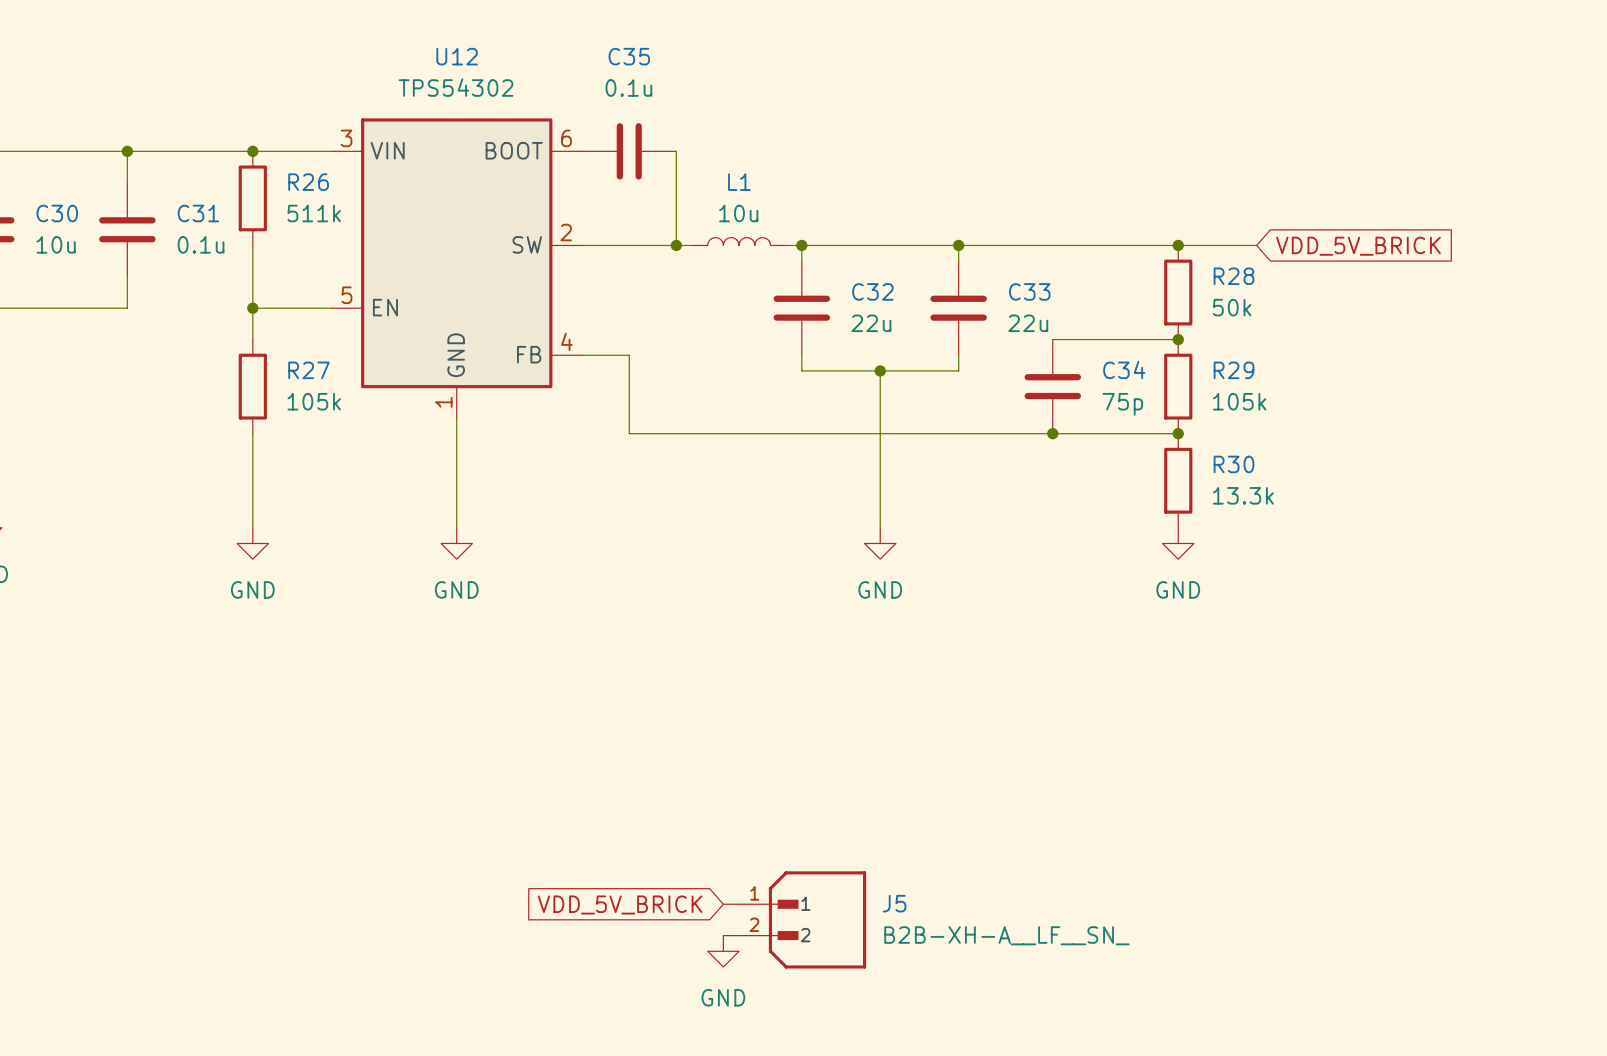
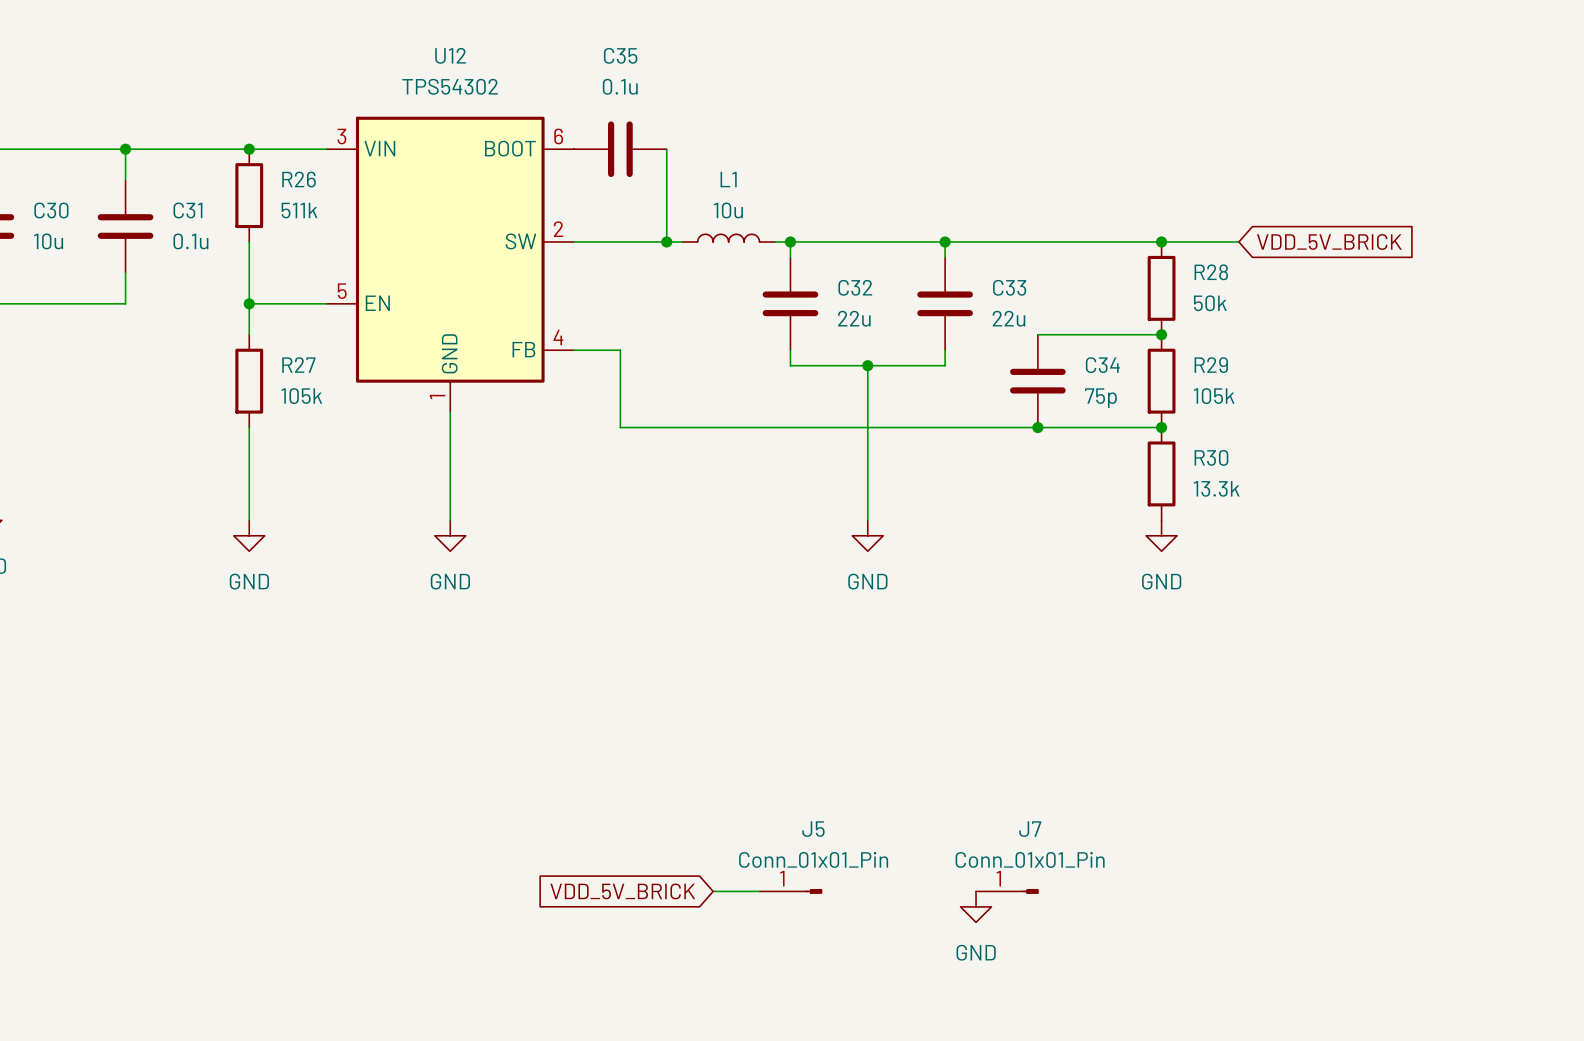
J5 symbol: [723, 871, 867, 969] -> [759, 888, 823, 894]
J5 name position: J5 (894, 903) -> J5 (813, 829)
J7: none -> Conn_01x01_Pin (1007, 891)
J5 value: B2B-XH-A__LF__SN_ (1006, 935) -> Conn_01x01_Pin (813, 859)
power symbol position: GND (723, 951) -> GND (976, 906)

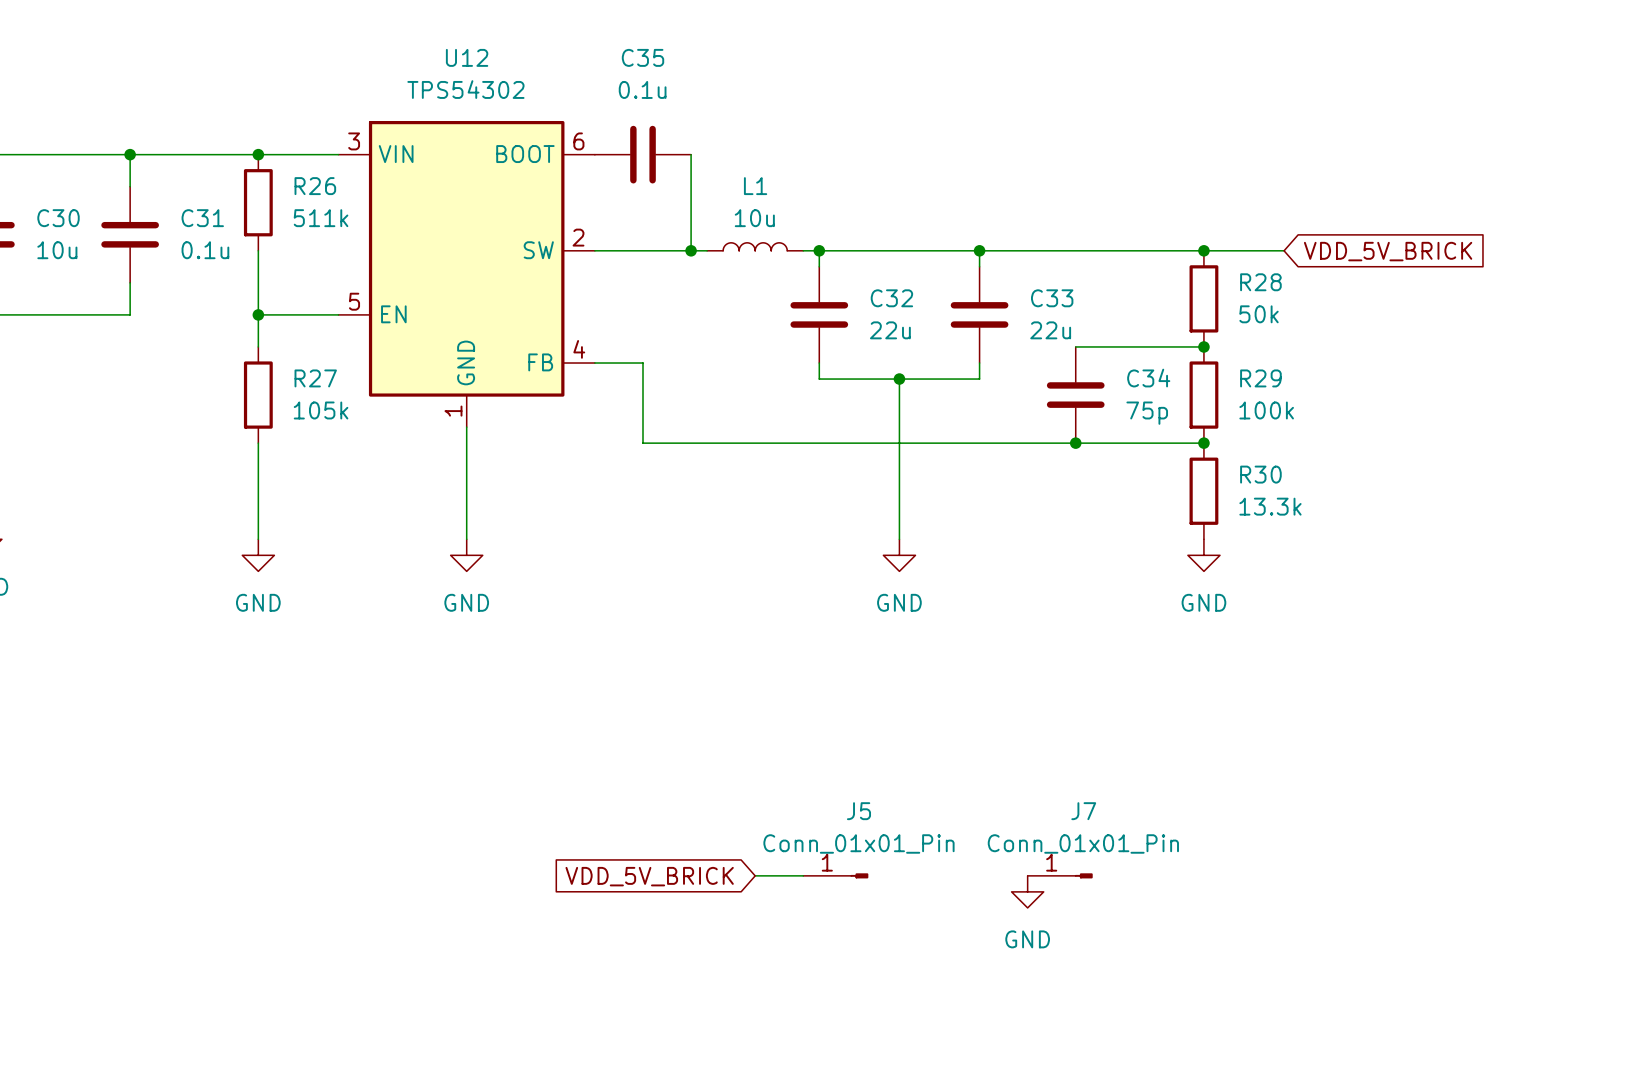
R29 value: 105k (1214, 396) -> 100k (1266, 410)
global label position: VDD_5V_BRICK (622, 891) -> VDD_5V_BRICK (649, 876)
wire: (713, 891) (759, 891) -> (755, 875) (803, 875)
J5 position: (790, 891) -> (835, 875)
J7 position: (1007, 891) -> (1060, 875)
power symbol position: GND (976, 906) -> GND (1027, 891)

